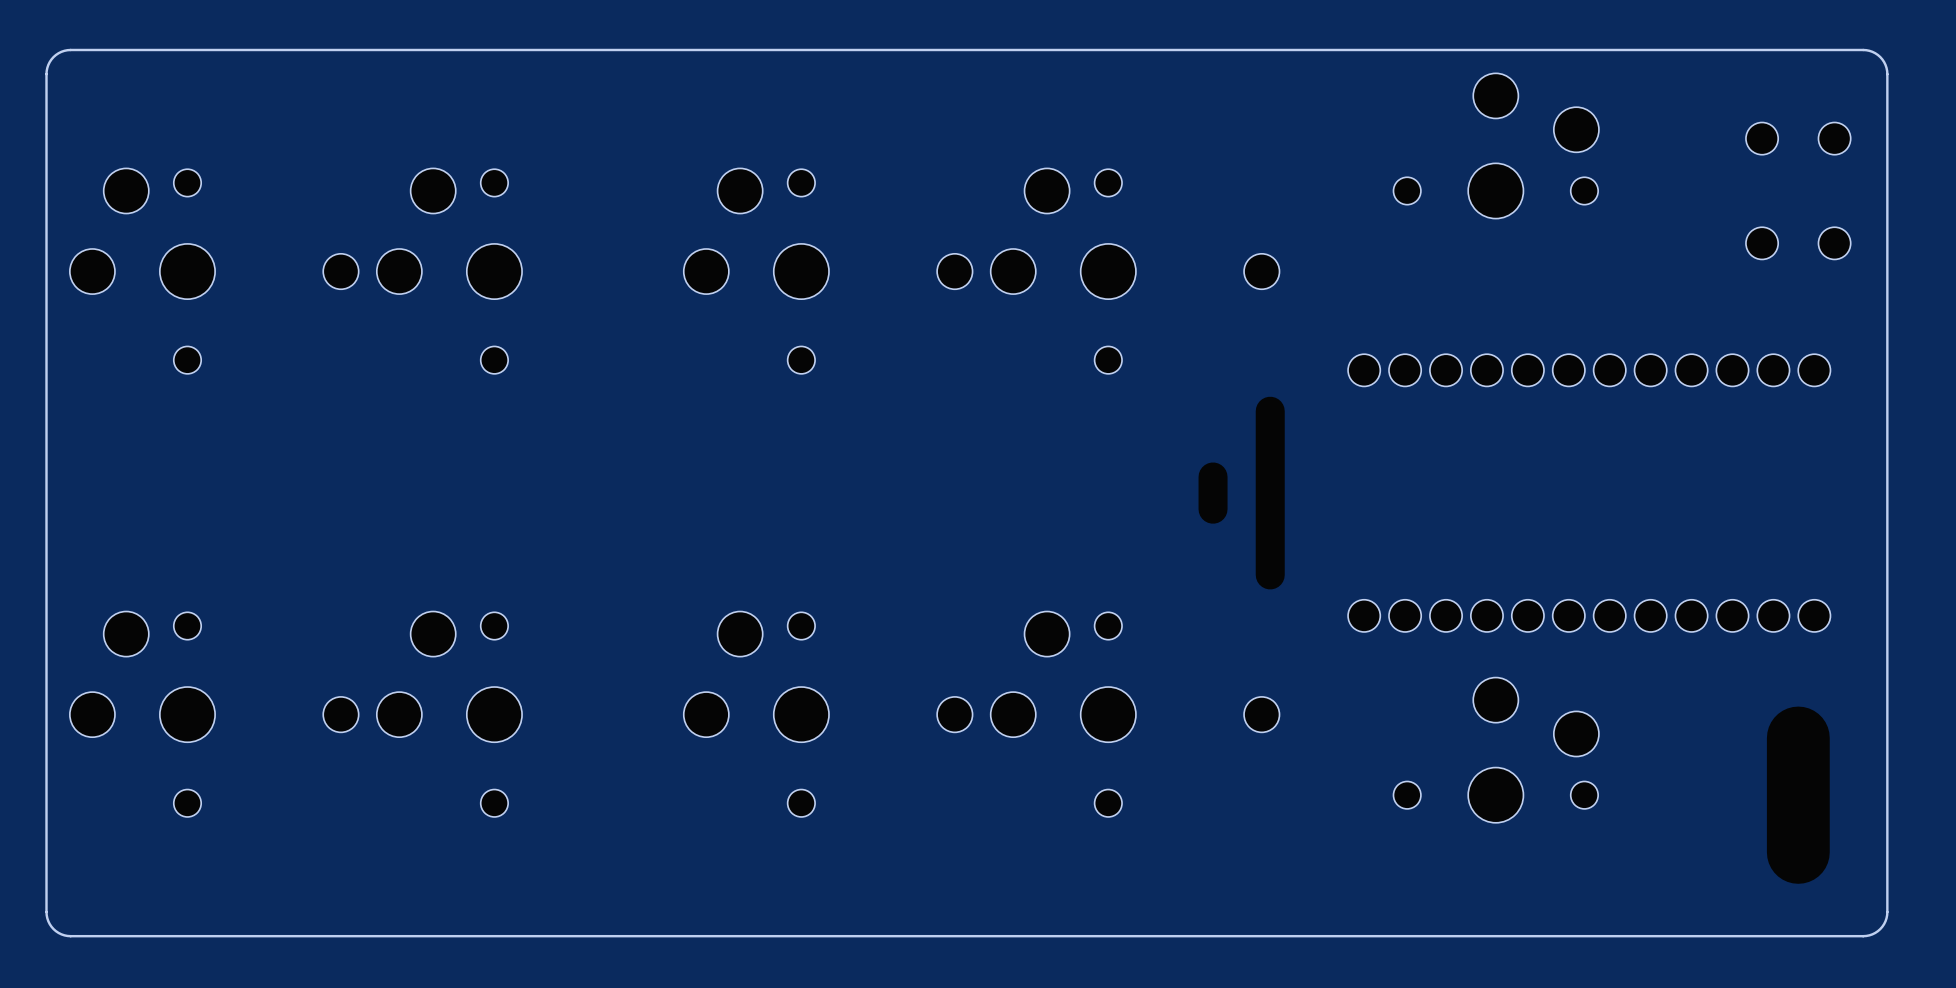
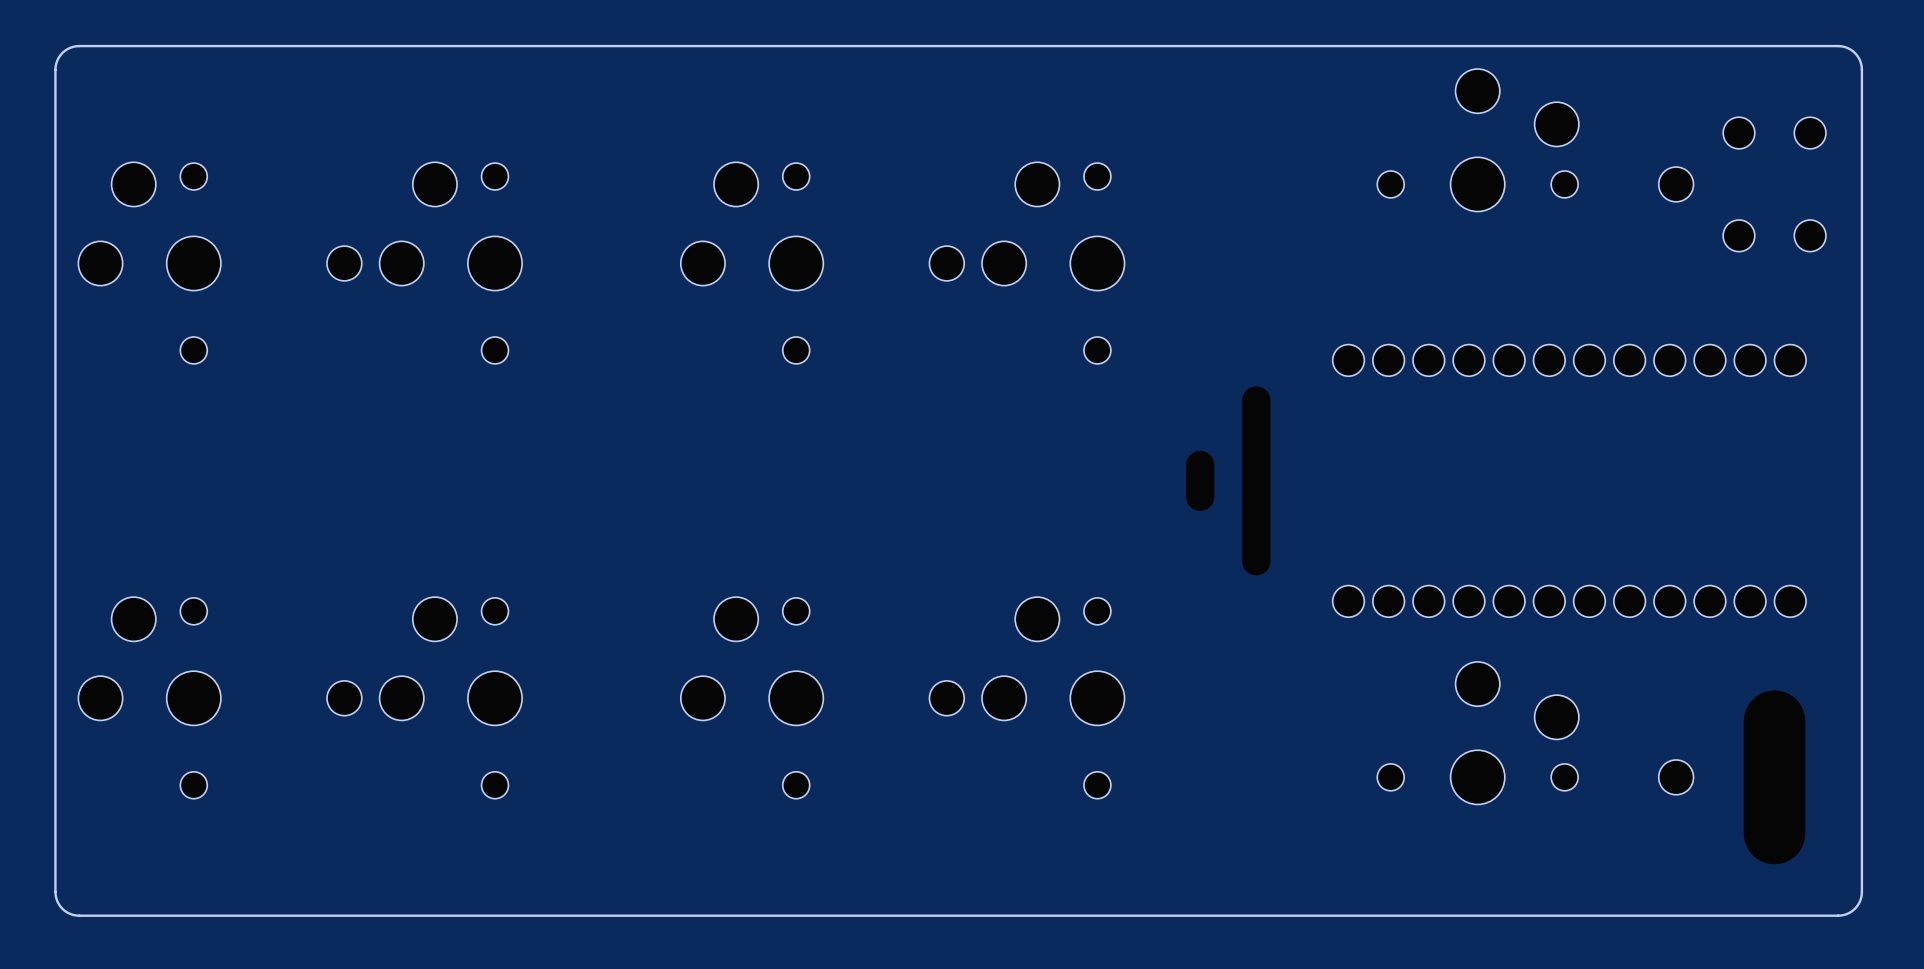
part: none -> (1676, 184)
part: (1261, 271) -> none
part: (1261, 714) -> none
part: none -> (1676, 777)

